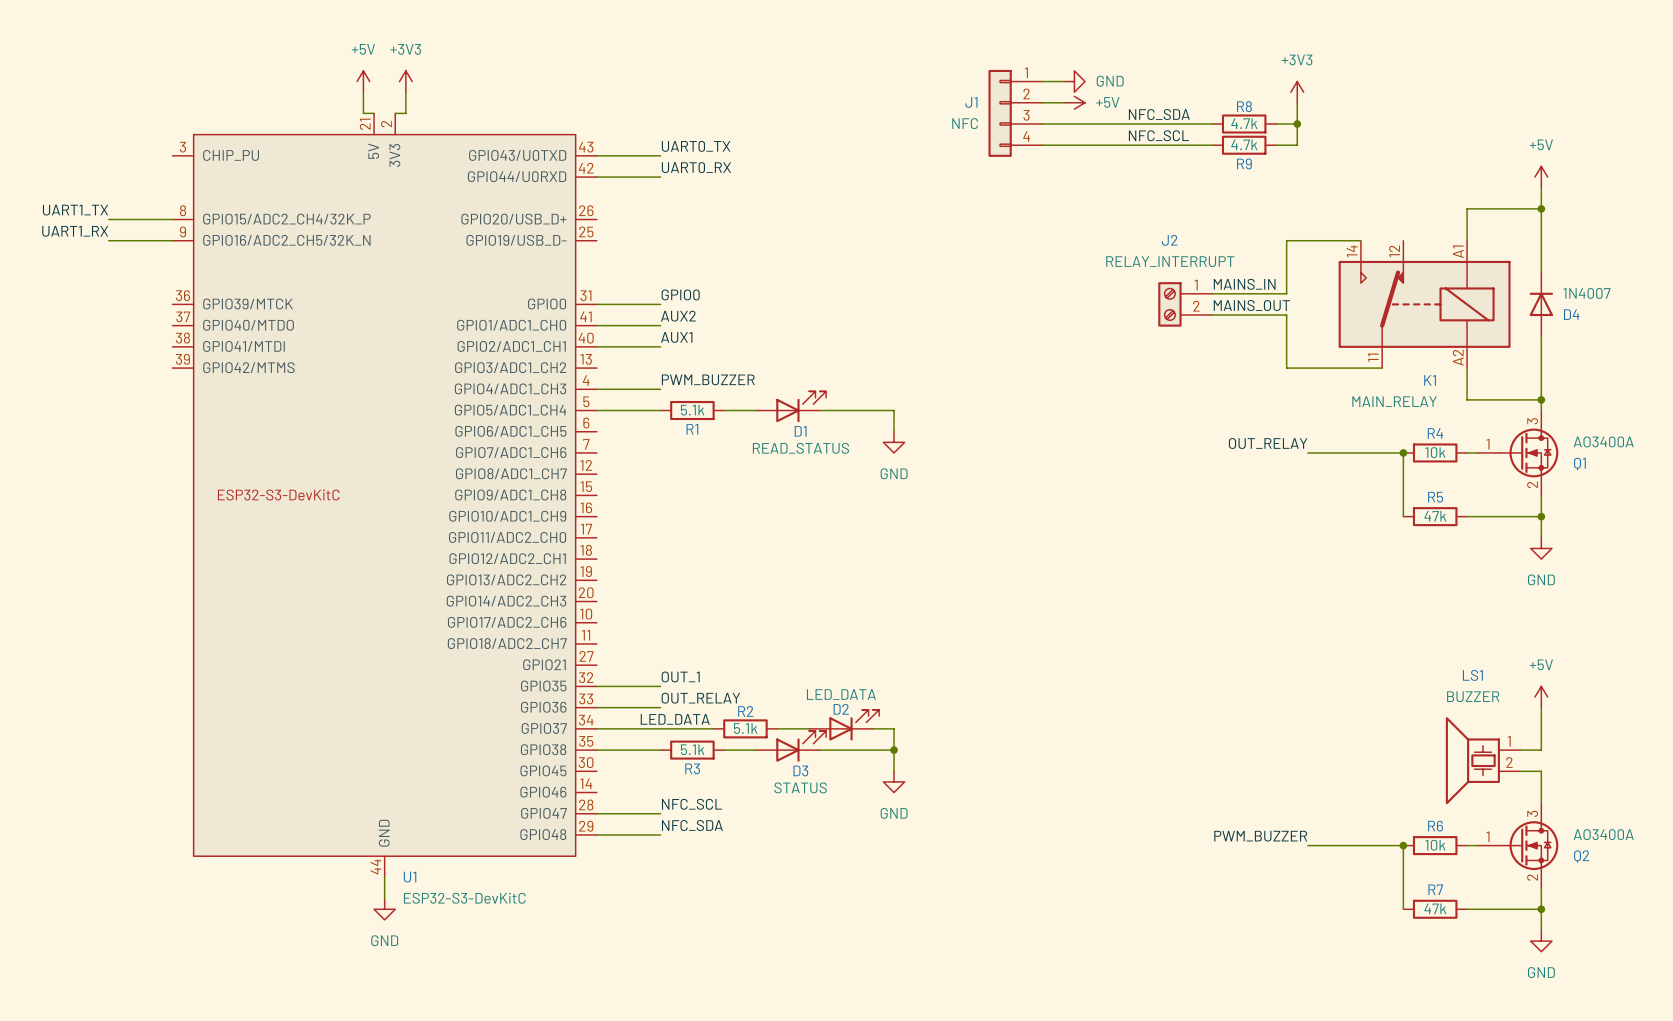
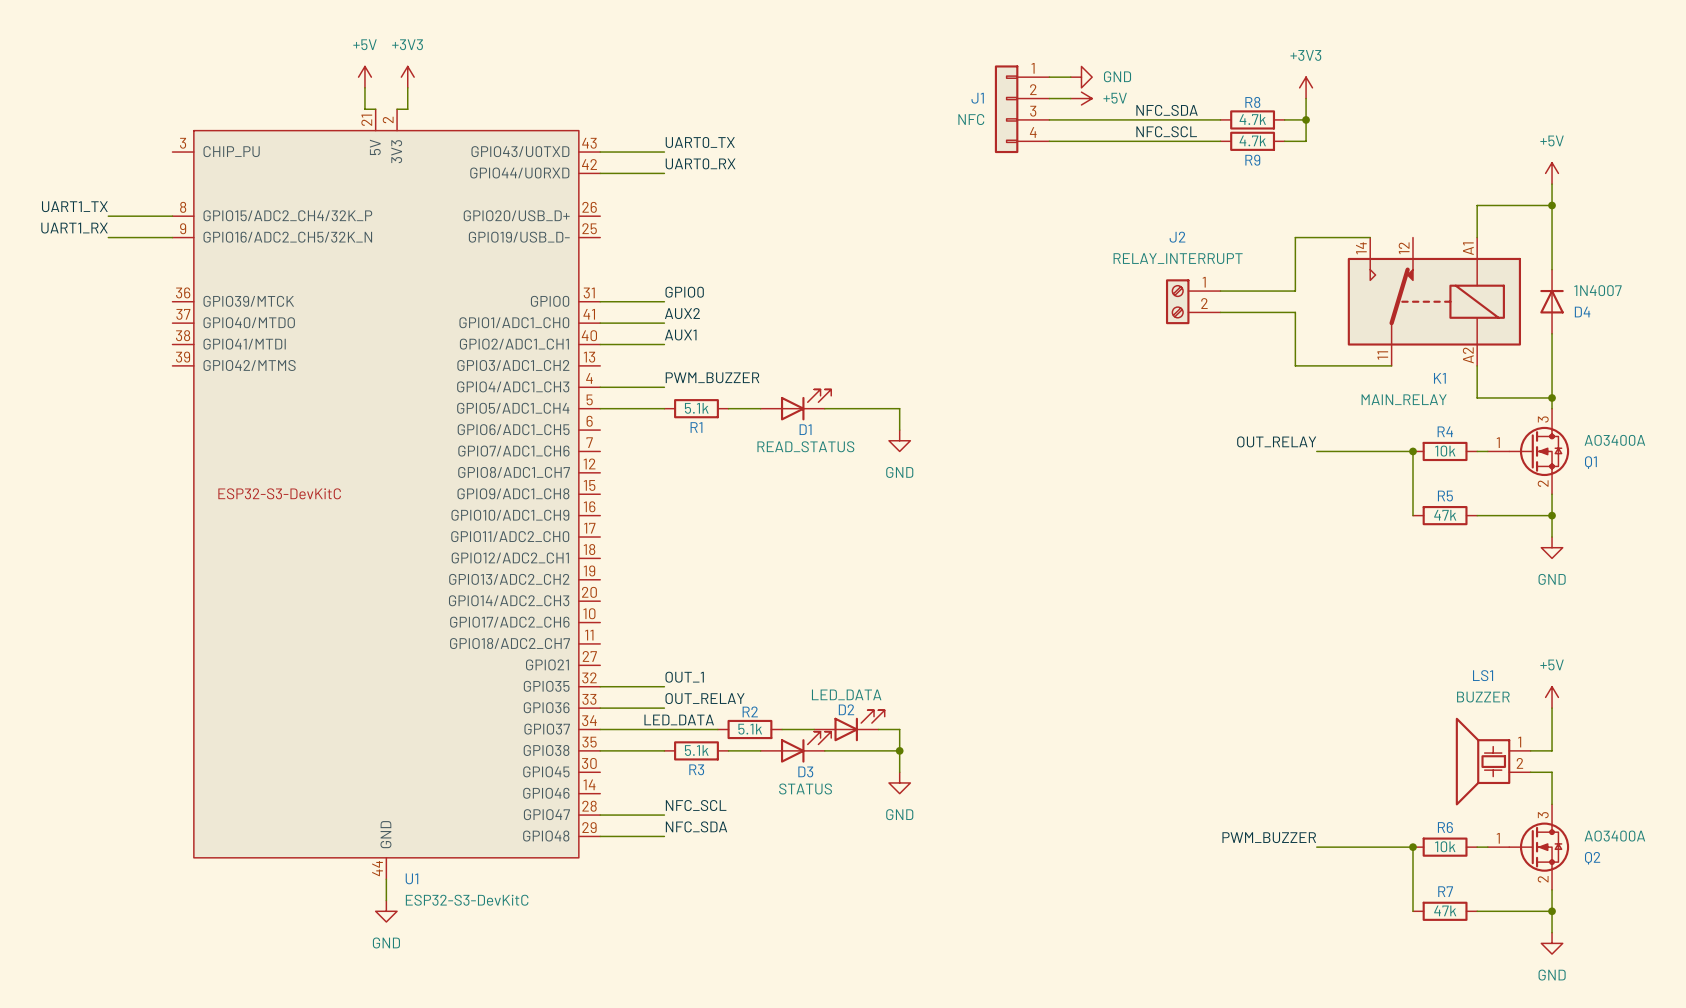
label: MAINS_IN (1244, 284) -> none
label: MAINS_OUT (1251, 305) -> none

